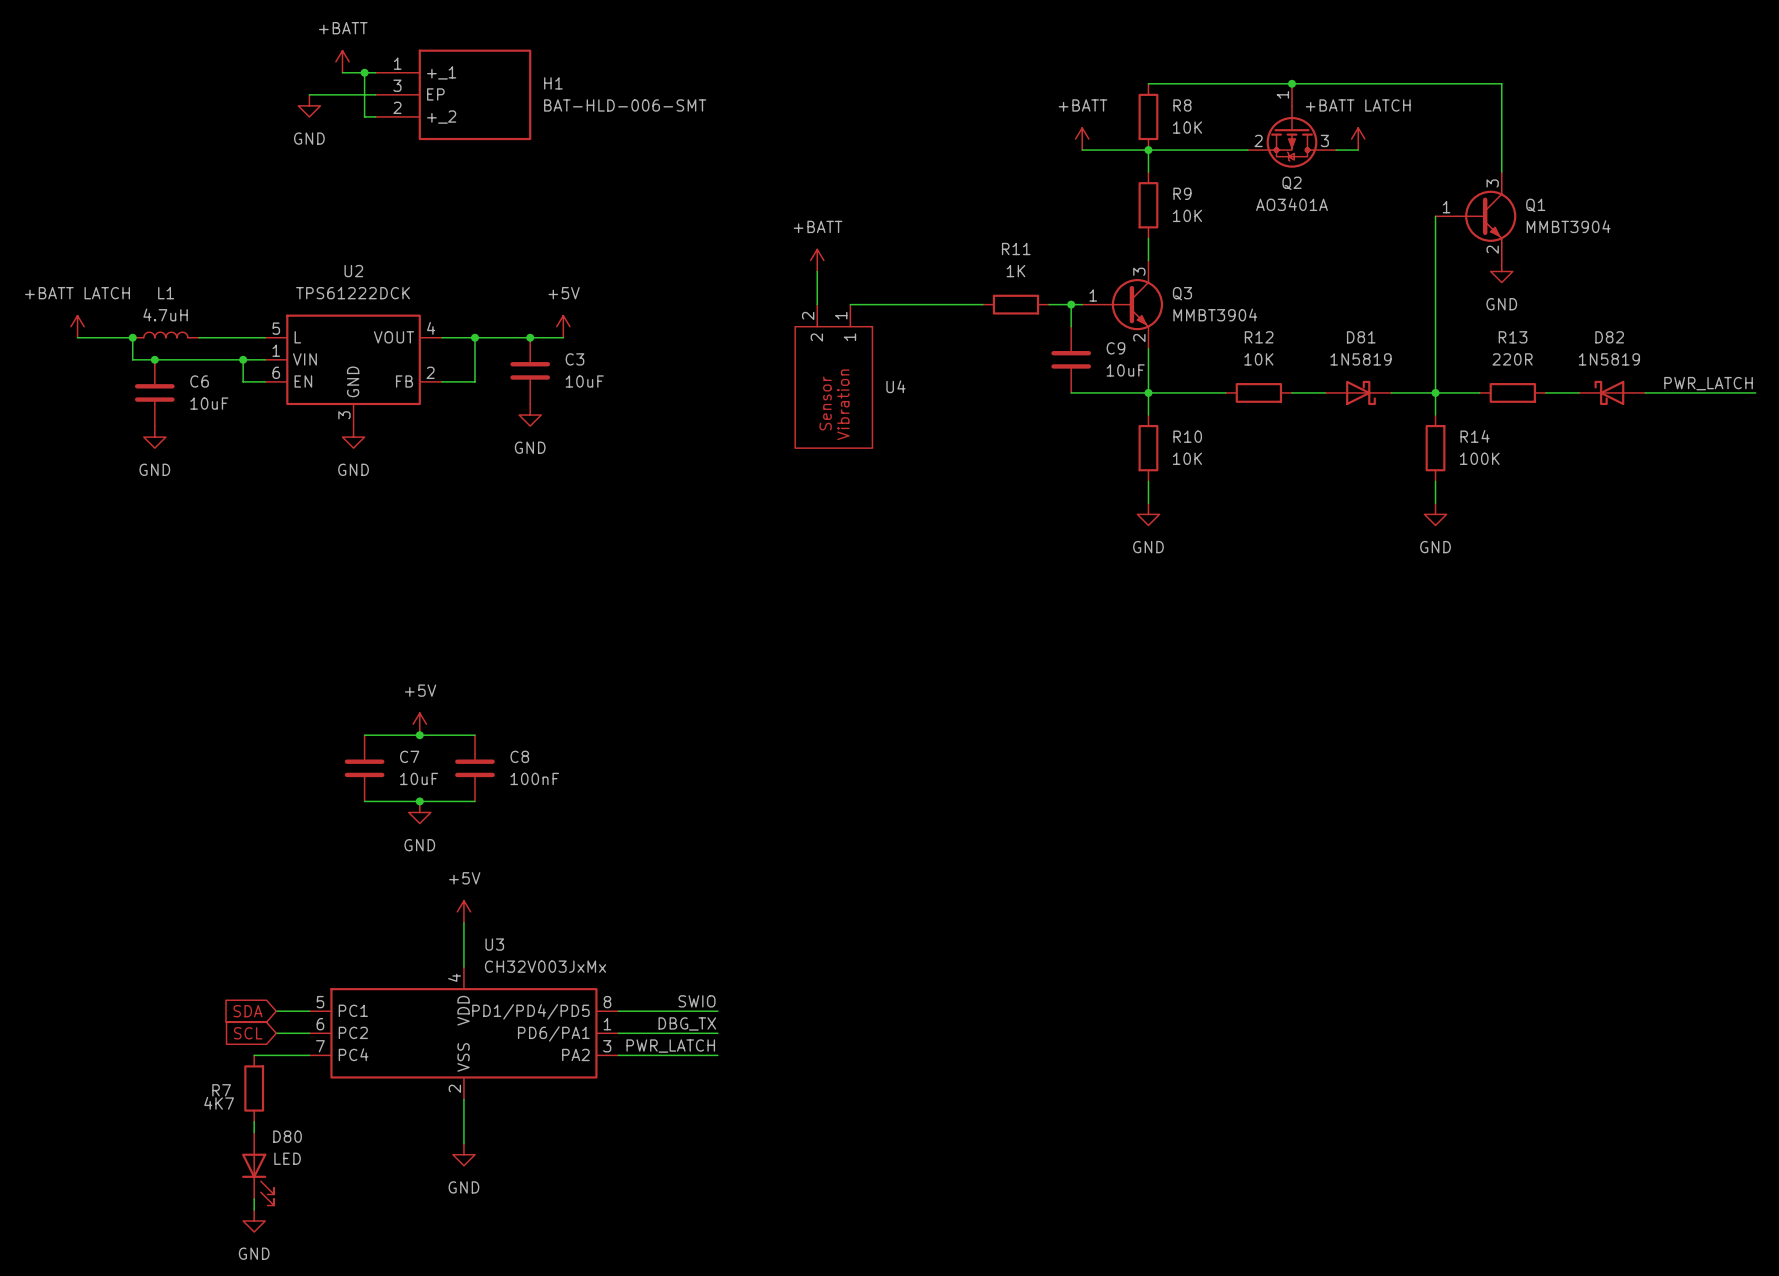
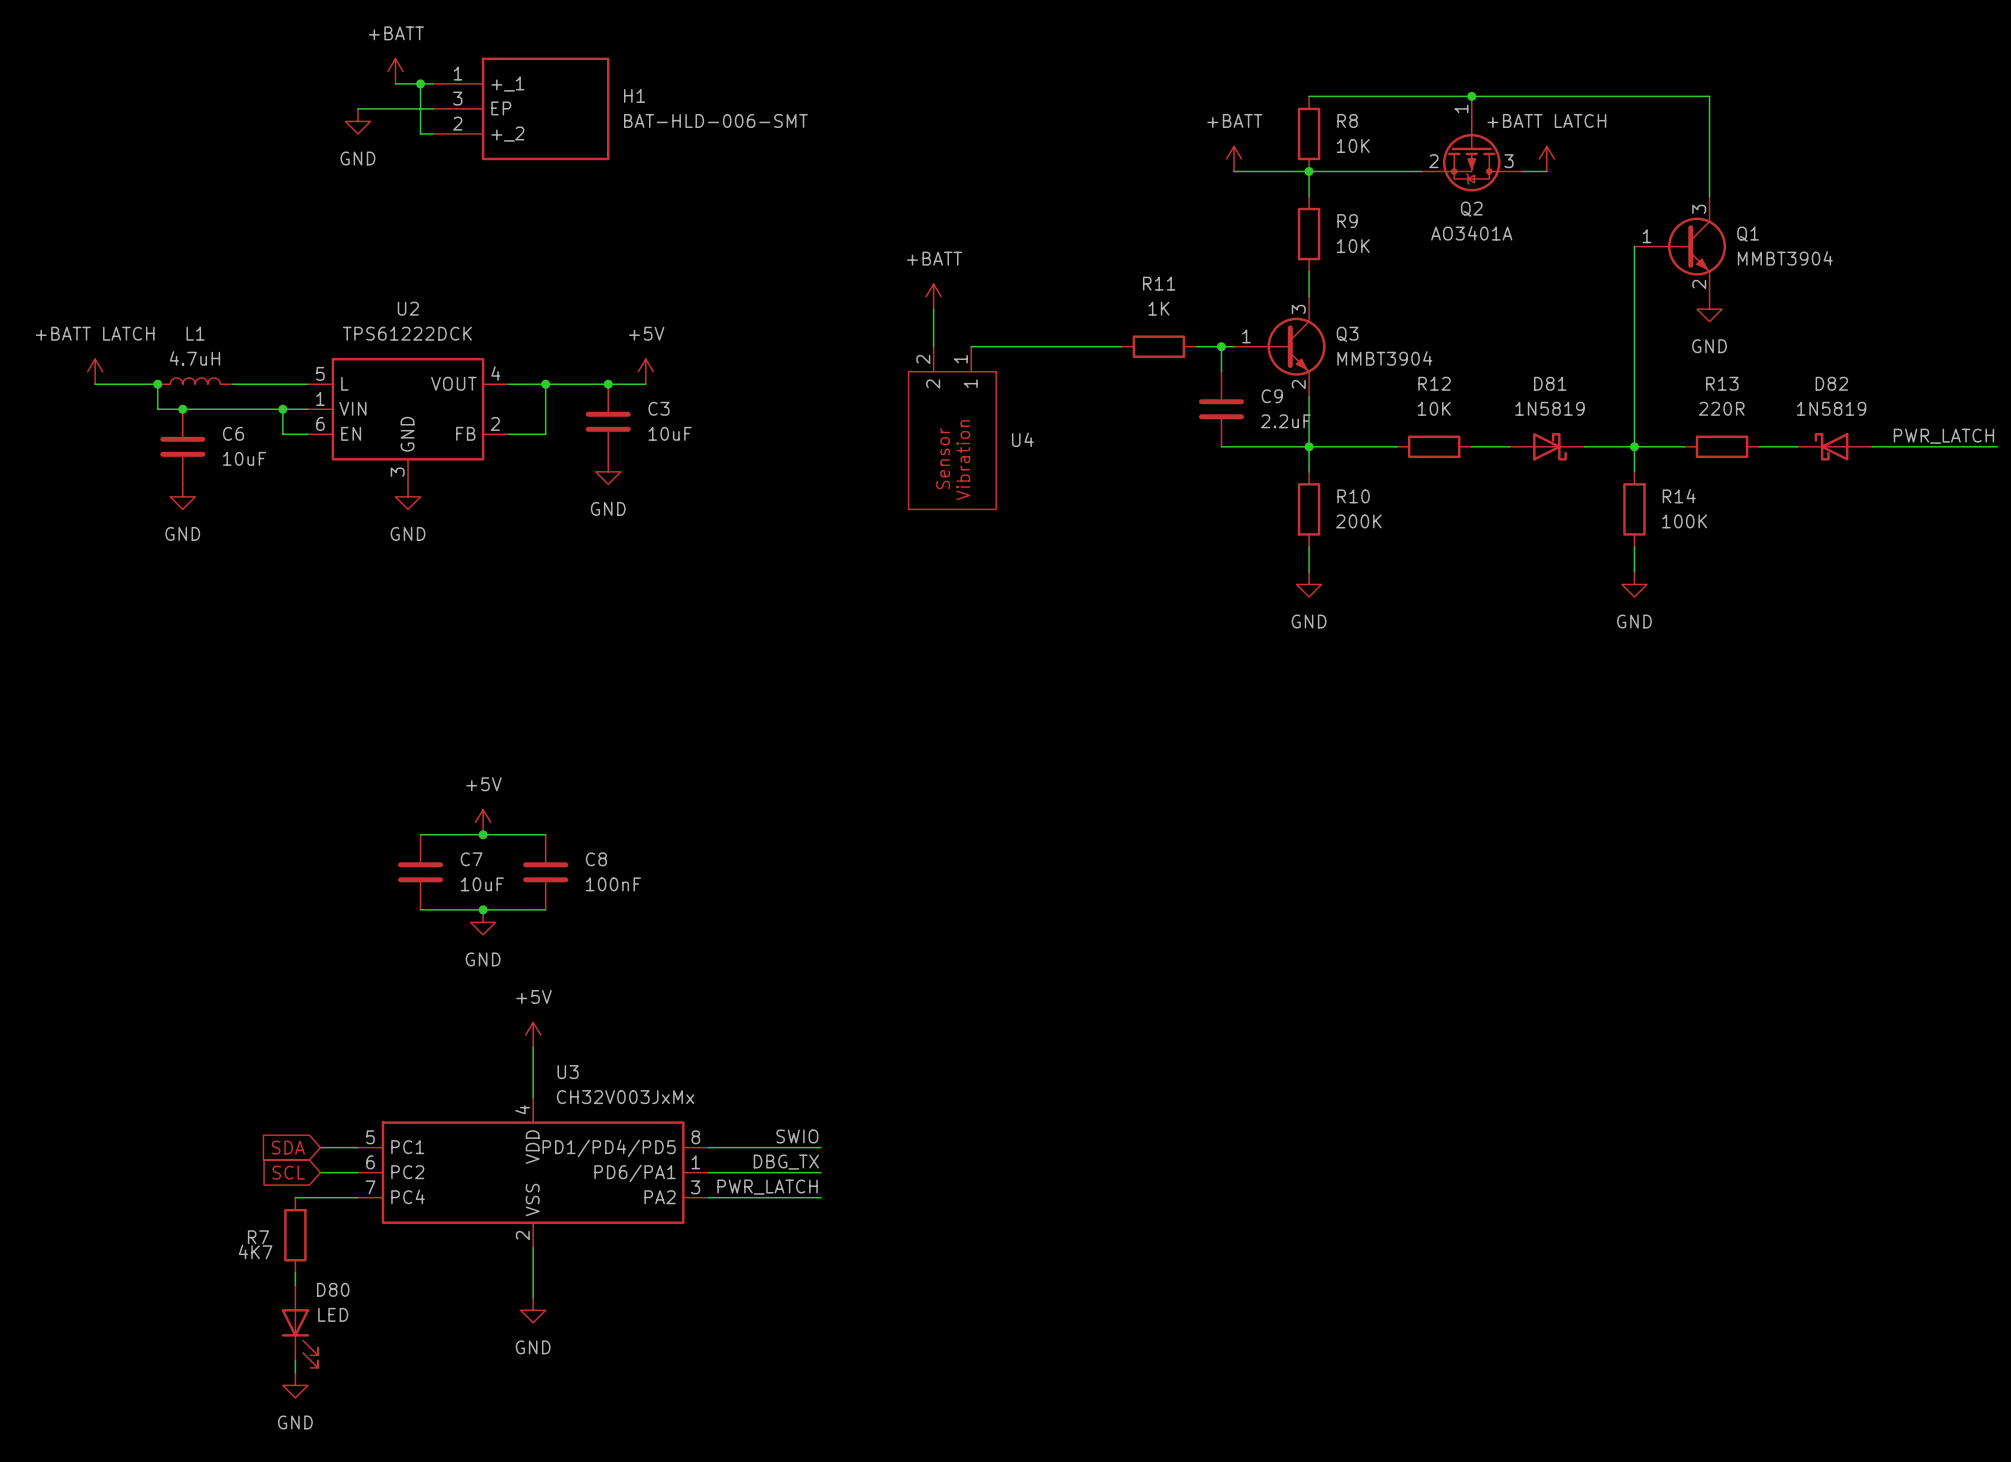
C9 value: 10uF (1125, 370) -> 2.2uF (1285, 421)
R10 value: 10K (1187, 458) -> 200K (1358, 521)

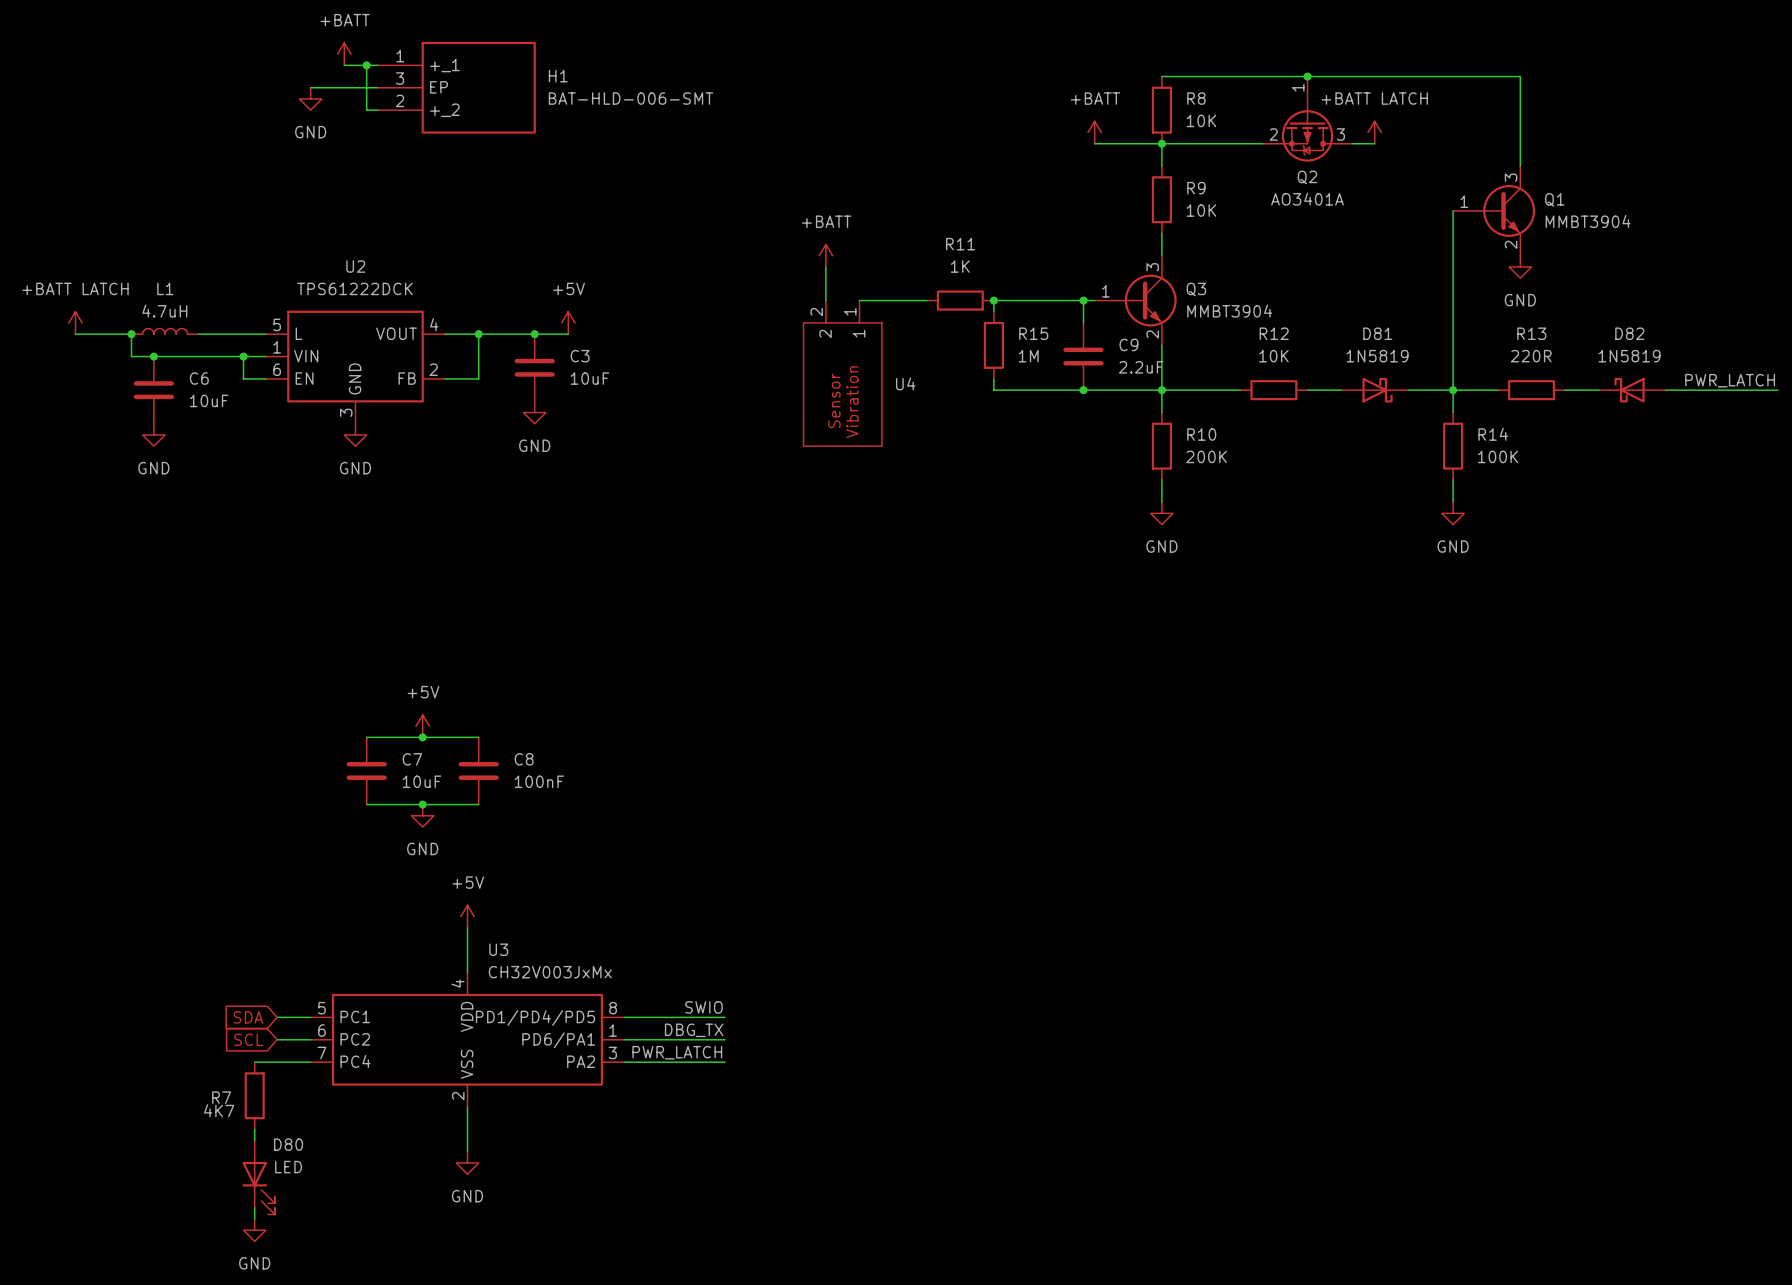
wire: (1046, 346) (1121, 346) -> none
junction: none -> (993, 300)
R11 position: (1158, 346) -> (960, 300)
wire: none -> (1061, 300) (993, 300) (993, 311)
R15: none -> 1M (993, 345)
wire: none -> (993, 378) (993, 390) (1083, 390)
junction: none -> (1083, 390)

